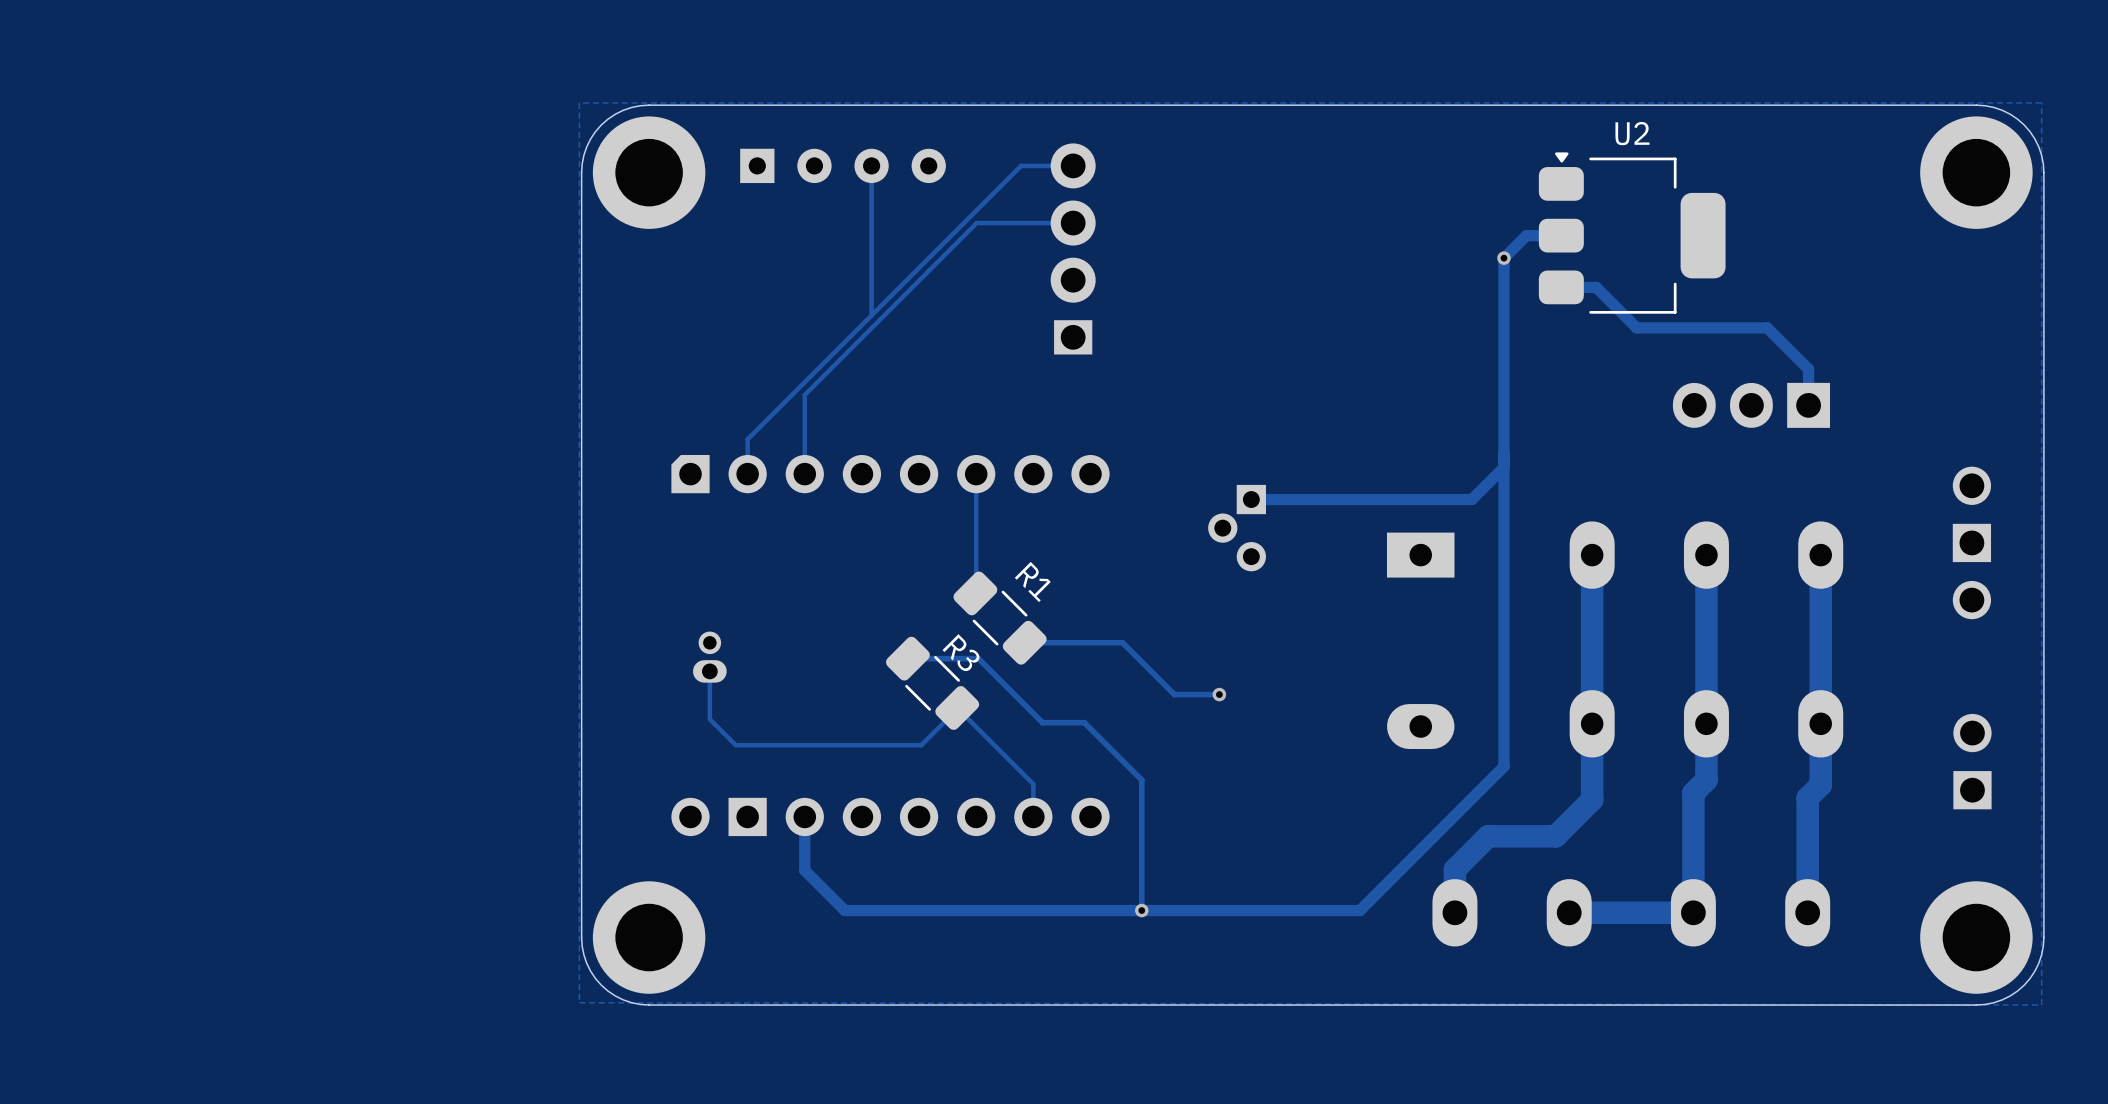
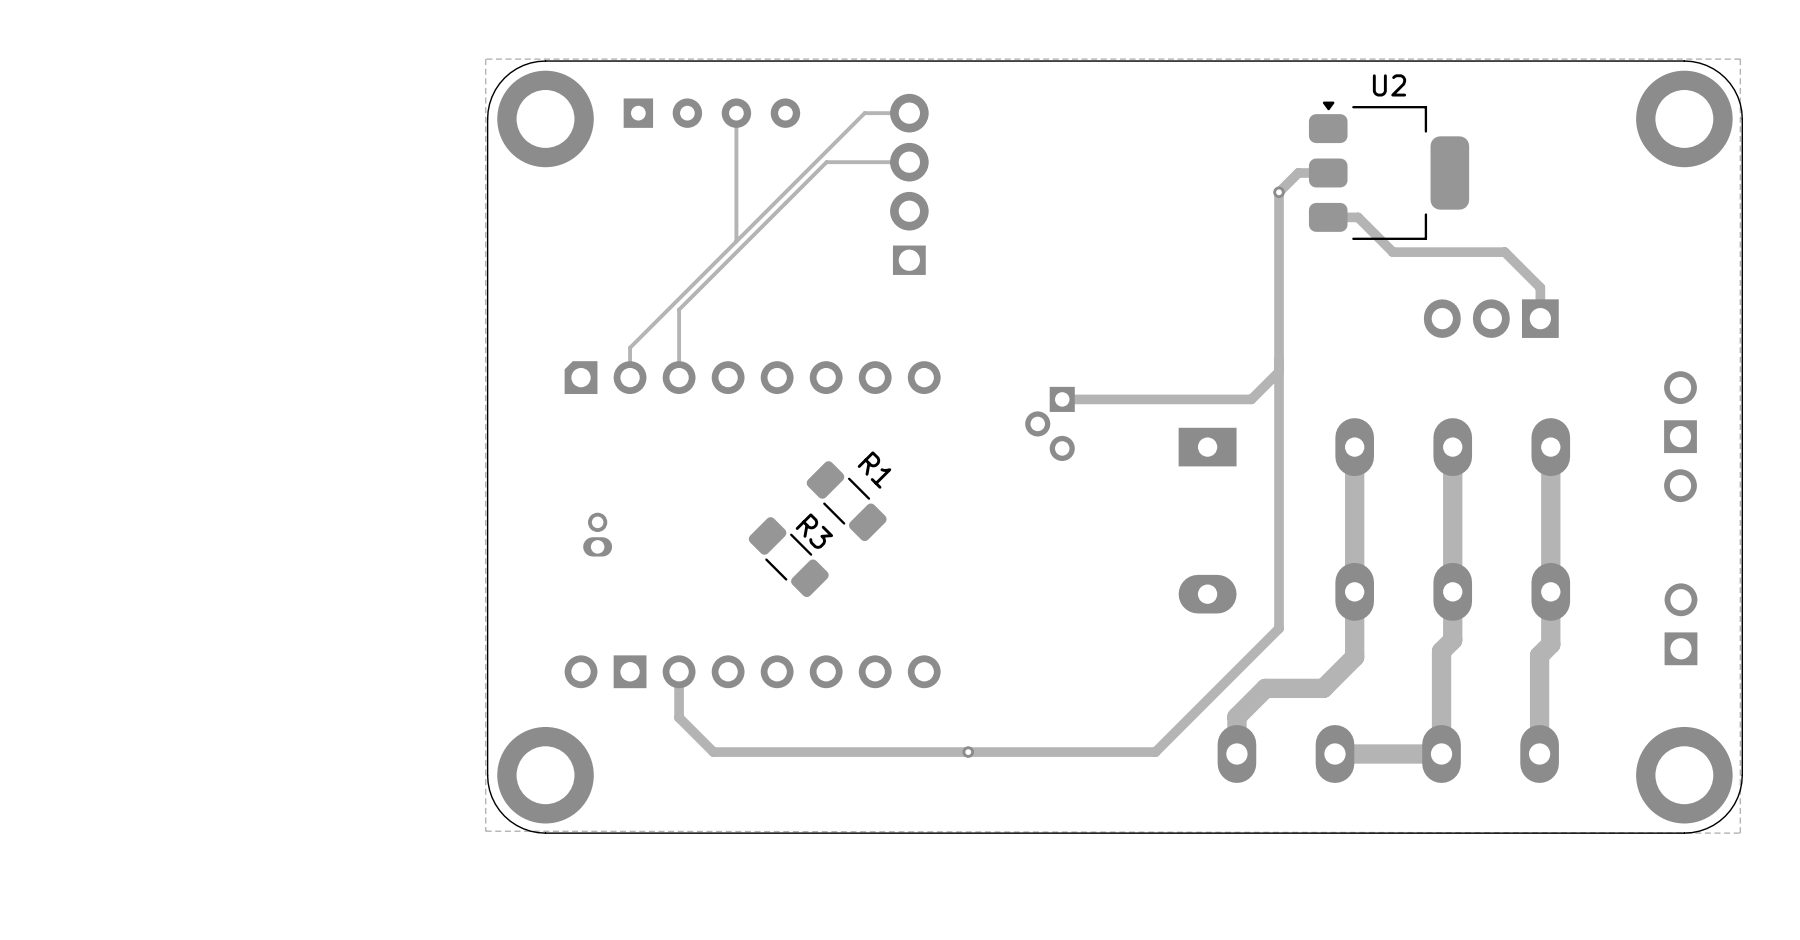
track: (976, 474) (975, 593) -> none
track: (1024, 642) (1122, 642) (1174, 694) (1219, 694) -> none
track: (907, 658) (978, 658) (1042, 722) (1084, 722) (1141, 780) (1141, 910) -> none
track: (709, 671) (709, 719) (735, 745) (921, 745) (957, 707) (1033, 784) (1033, 816) -> none
via: (1219, 694) -> none

